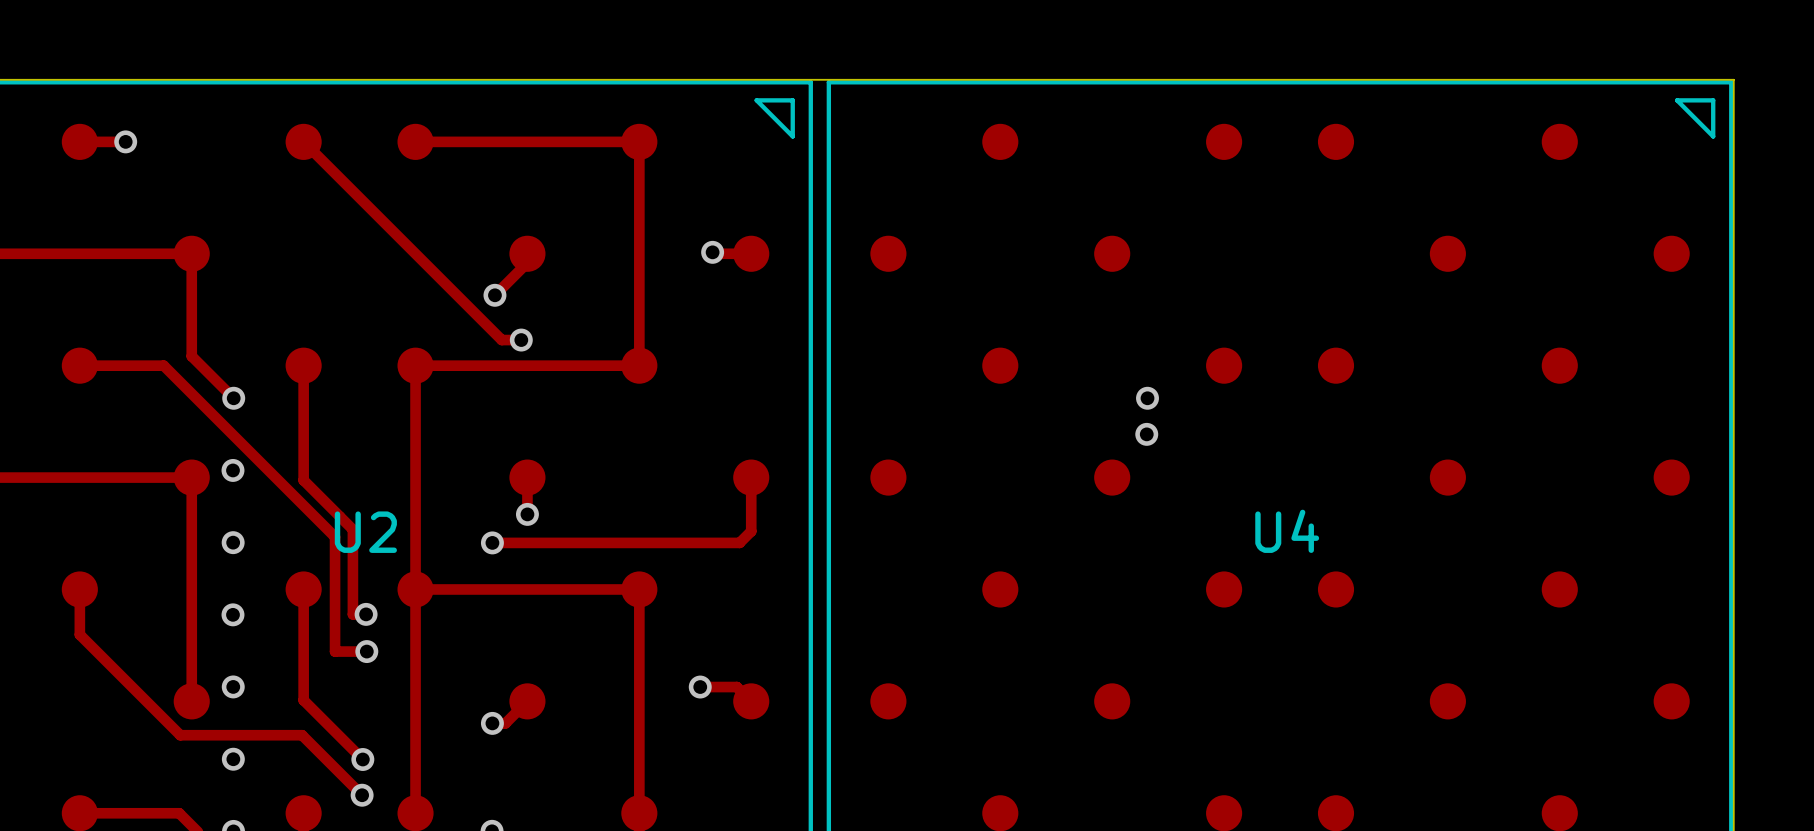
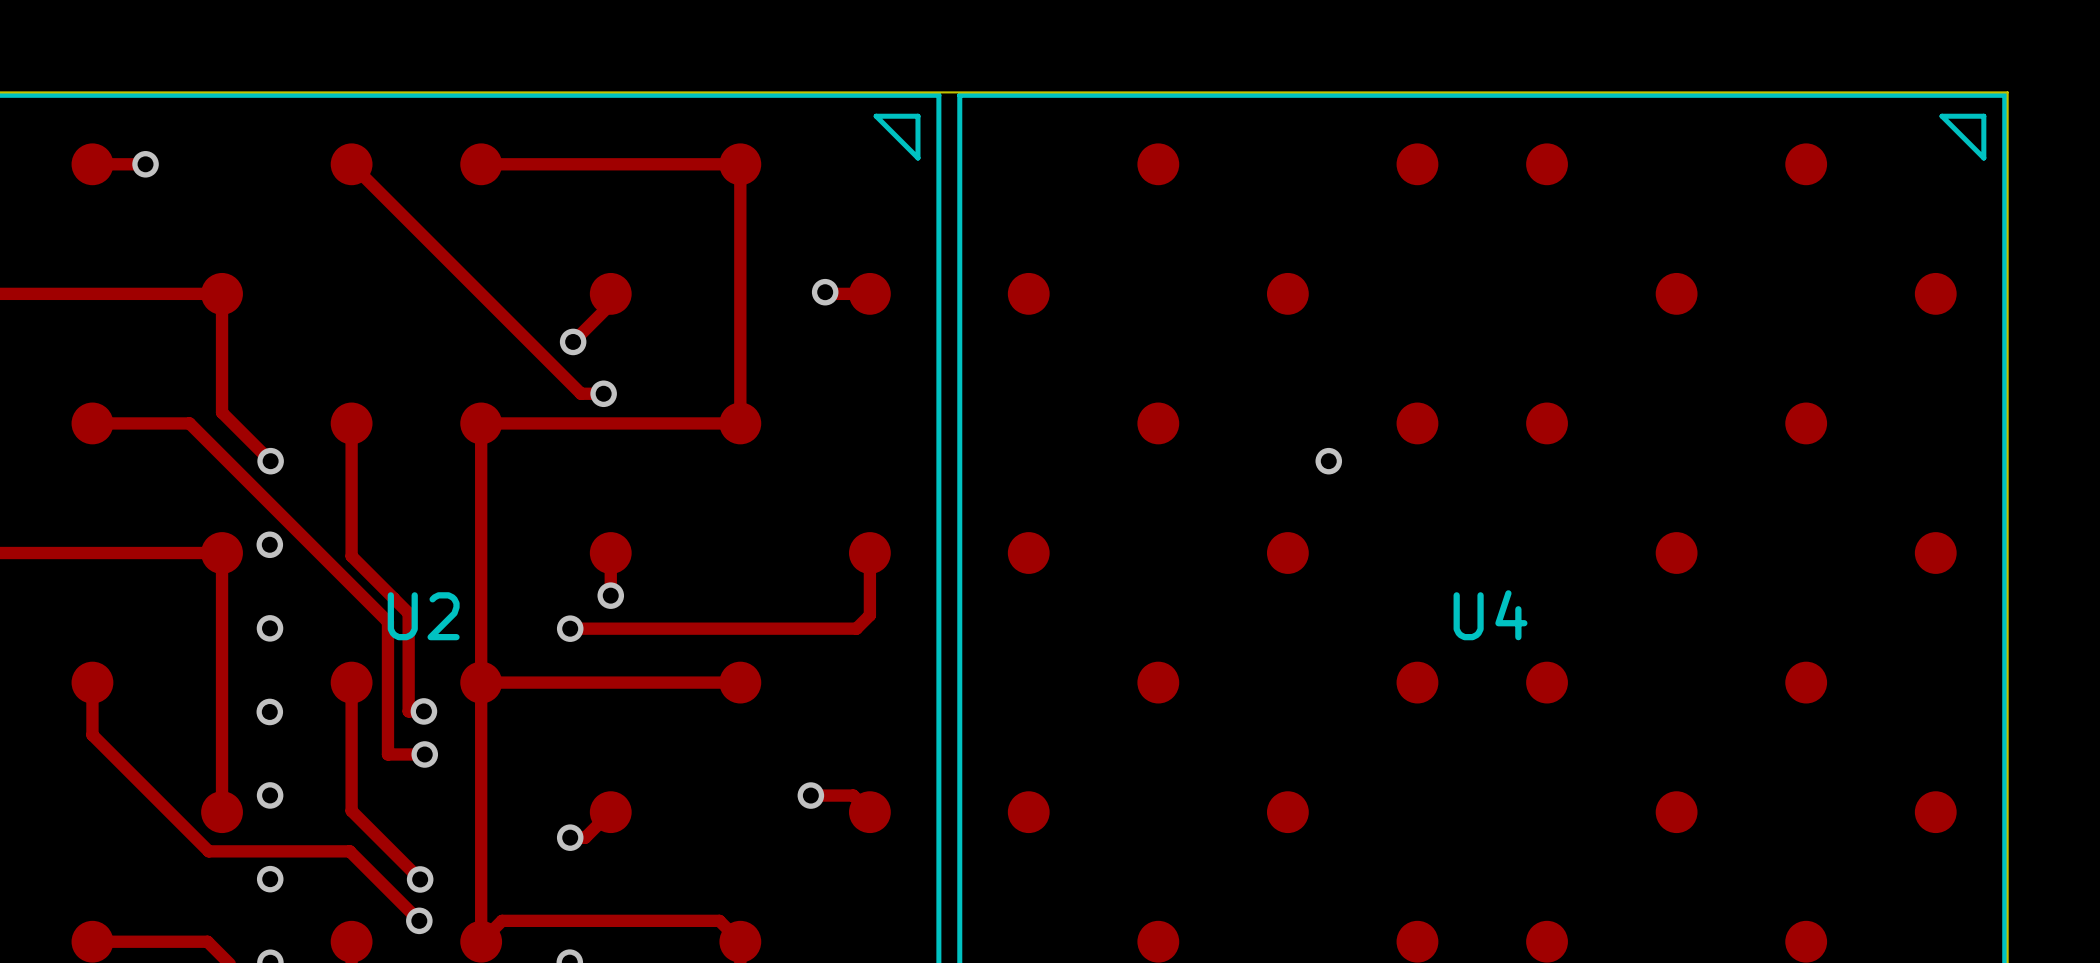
via: (1146, 434) -> none
track: (639, 589) (639, 813) -> (481, 941) (502, 920) (719, 920) (740, 941)

